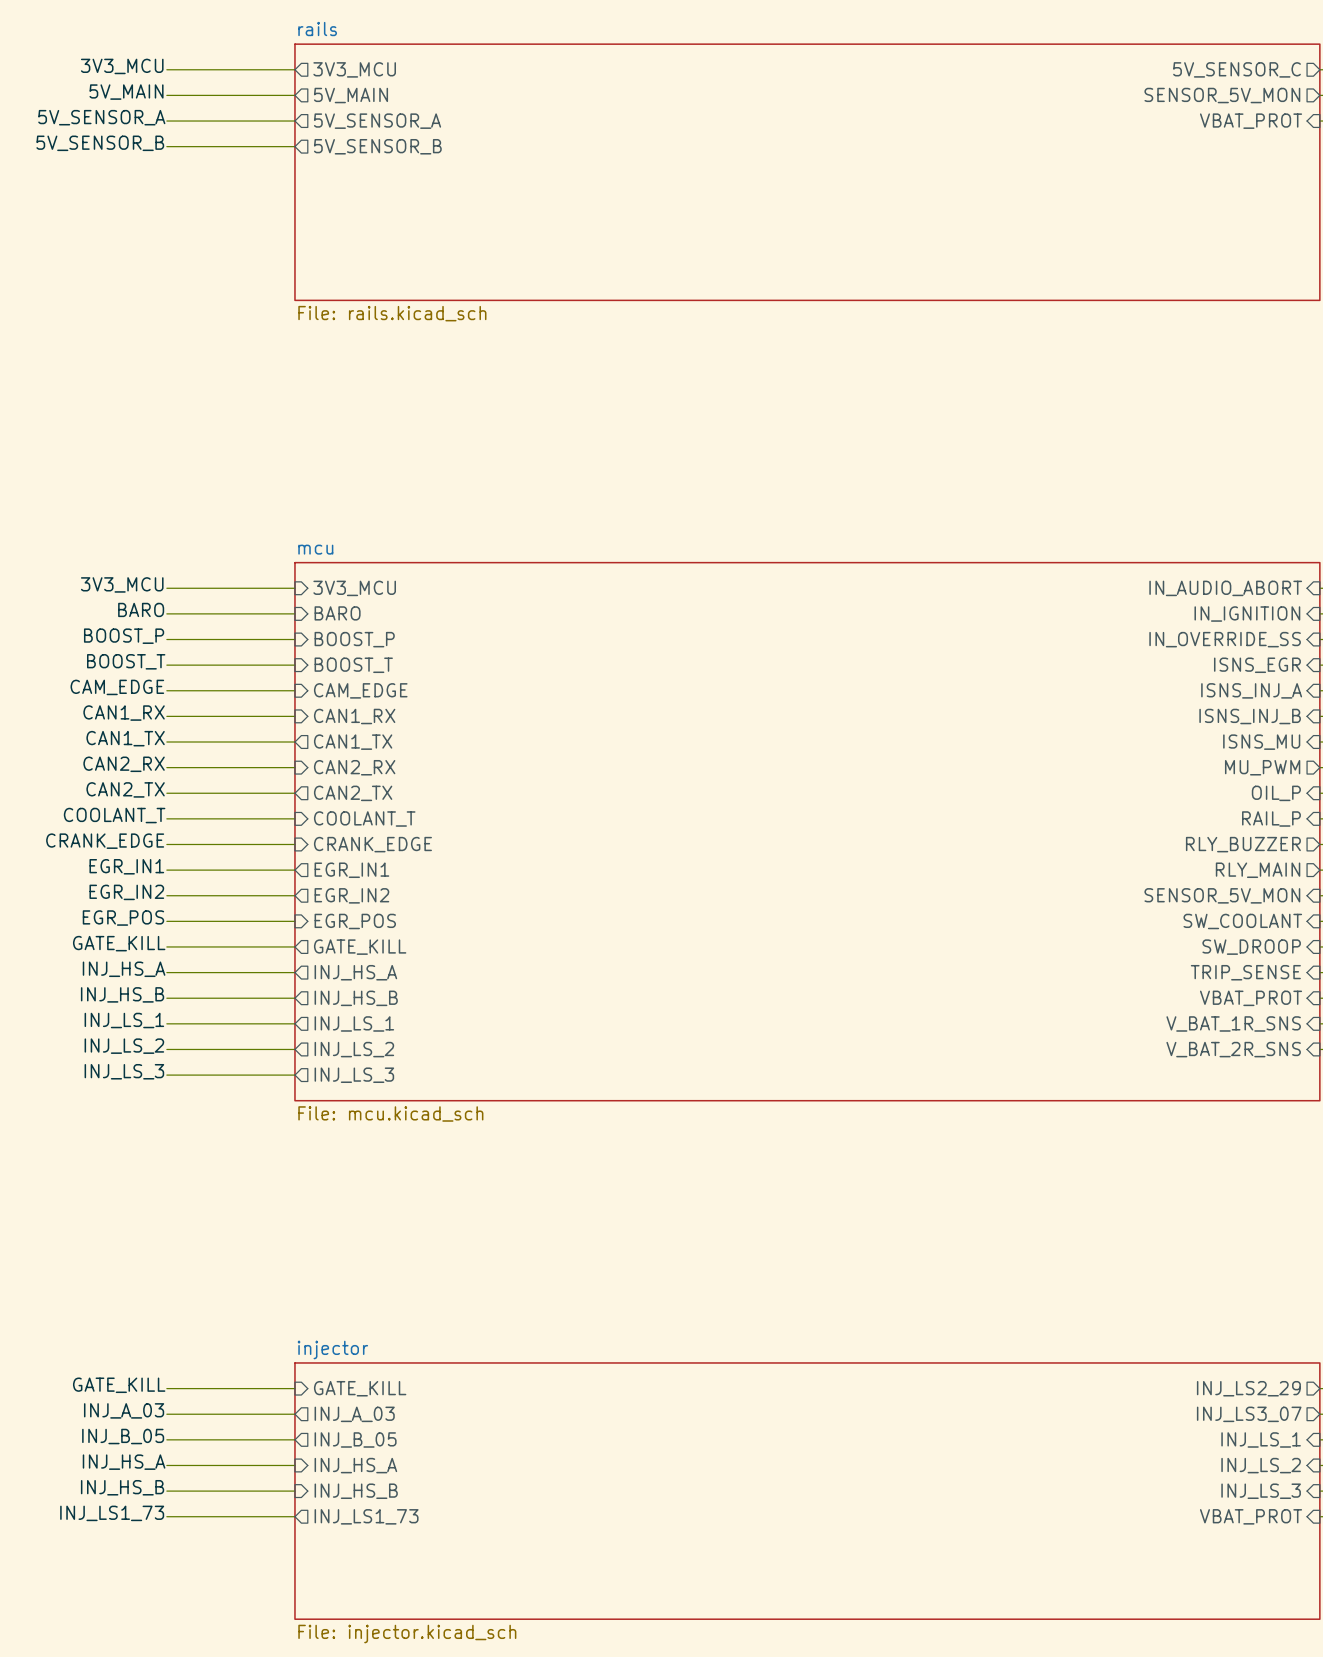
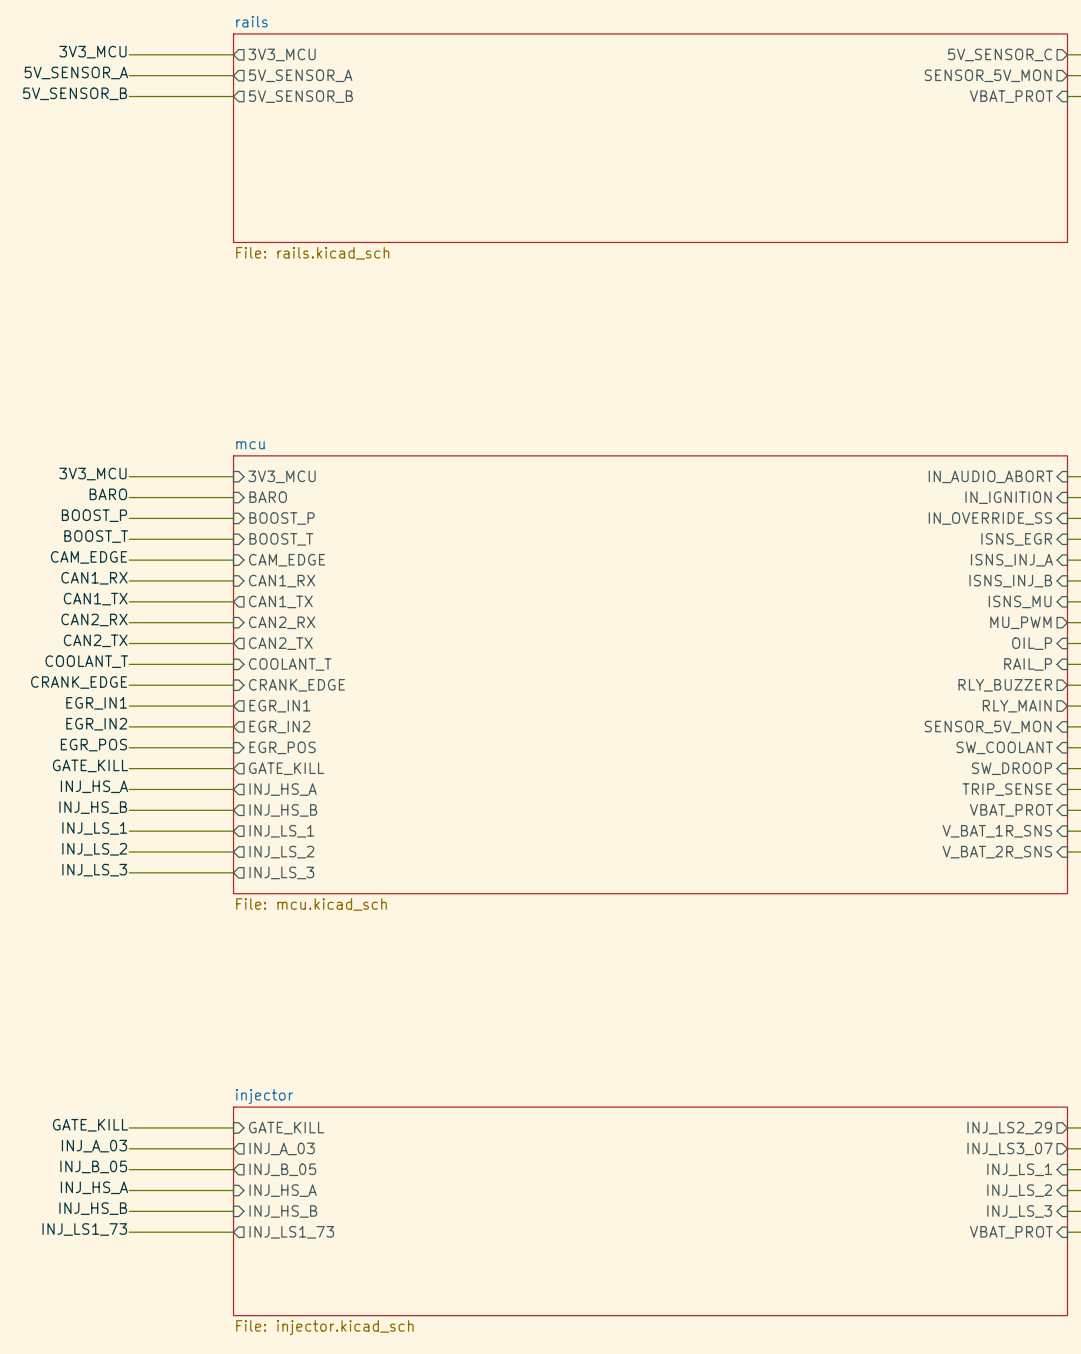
label: 5V_MAIN (126, 92) -> 5V_SENSOR_A (76, 72)
sheet pin: 5V_MAIN (351, 95) -> 5V_SENSOR_A (300, 75)
label: 5V_SENSOR_A (101, 117) -> 5V_SENSOR_B (75, 93)
sheet pin: 5V_SENSOR_A (377, 121) -> 5V_SENSOR_B (300, 96)
label: 5V_SENSOR_B (100, 143) -> none
wire: (166, 146) (294, 146) -> none
sheet pin: 5V_SENSOR_B (377, 146) -> none

